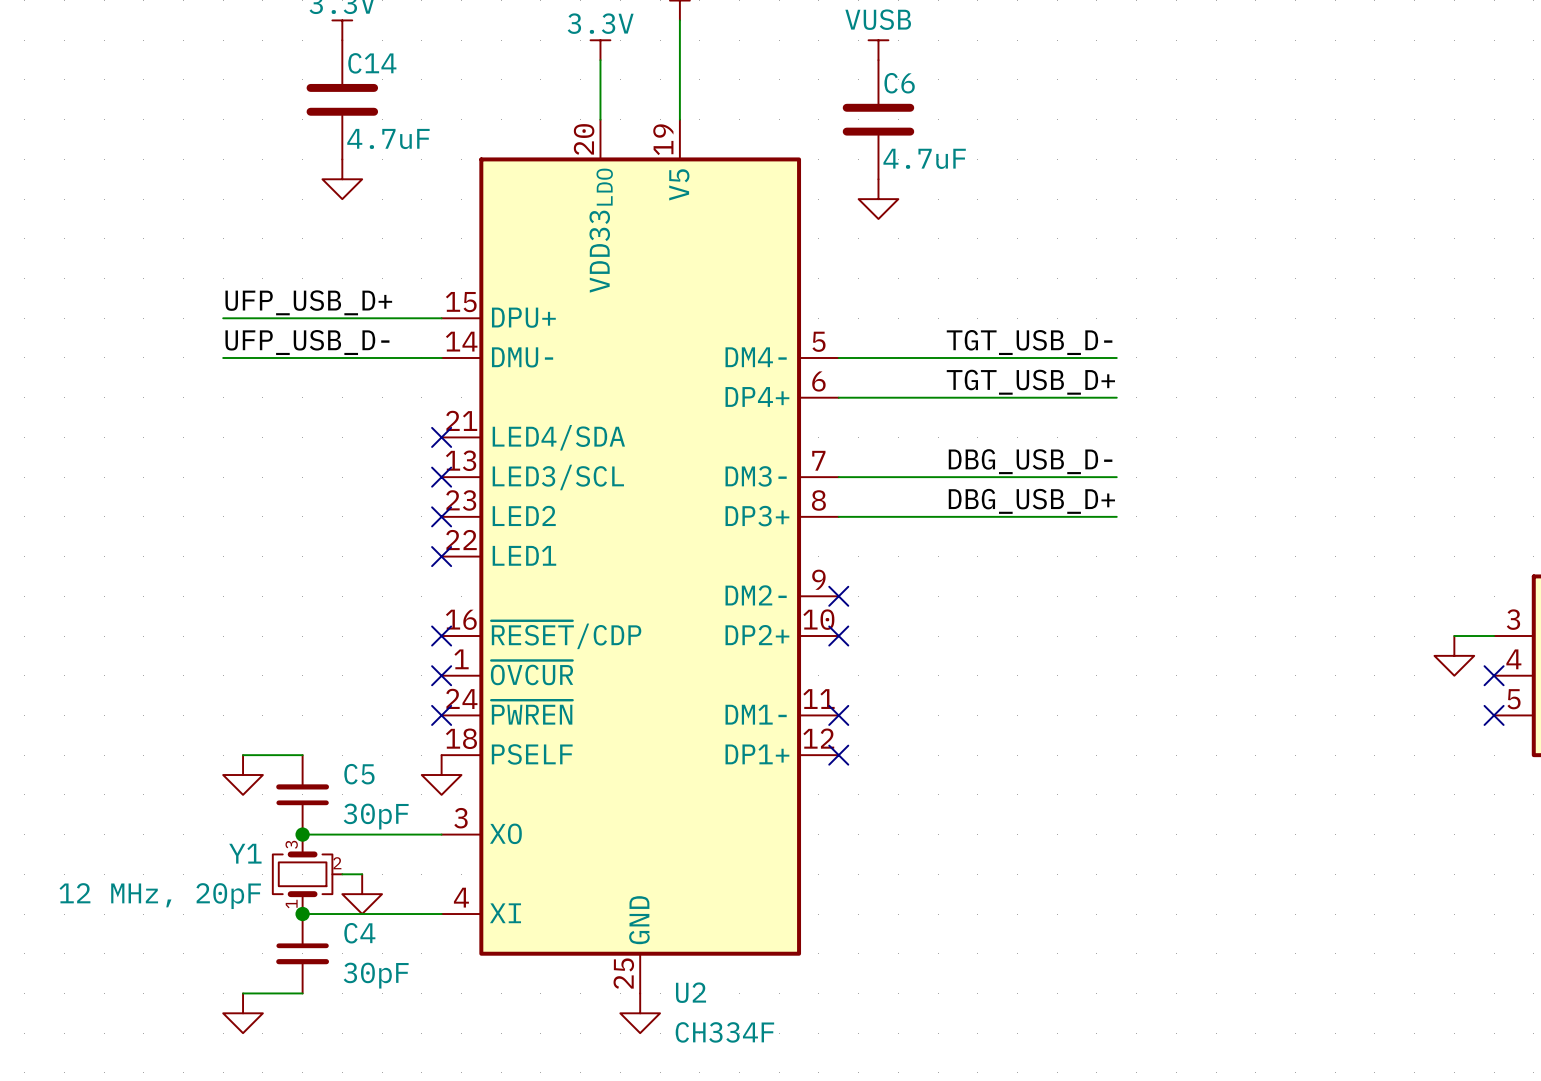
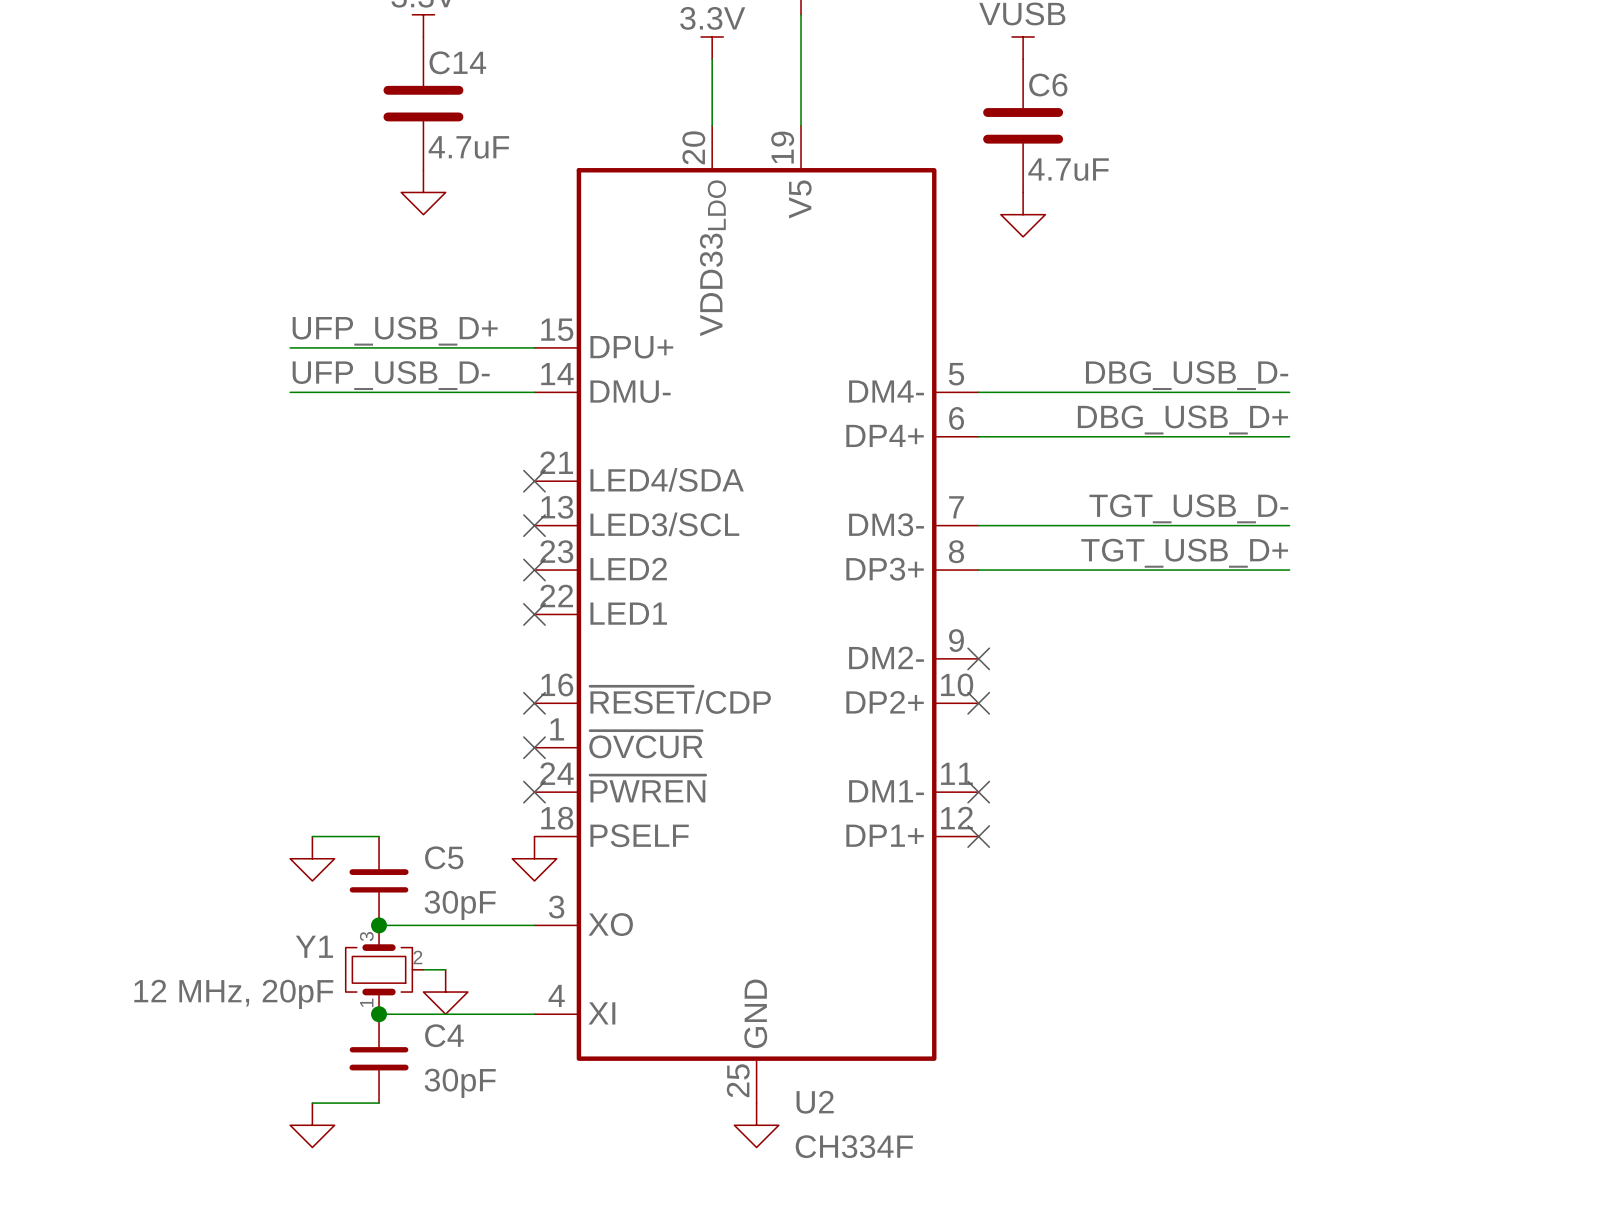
label: TGT_USB_D- (1029, 342) -> DBG_USB_D- (1187, 375)
label: TGT_USB_D+ (1030, 382) -> DBG_USB_D+ (1182, 420)
label: DBG_USB_D- (1030, 461) -> TGT_USB_D- (1188, 508)
label: DBG_USB_D+ (1031, 501) -> TGT_USB_D+ (1184, 553)

